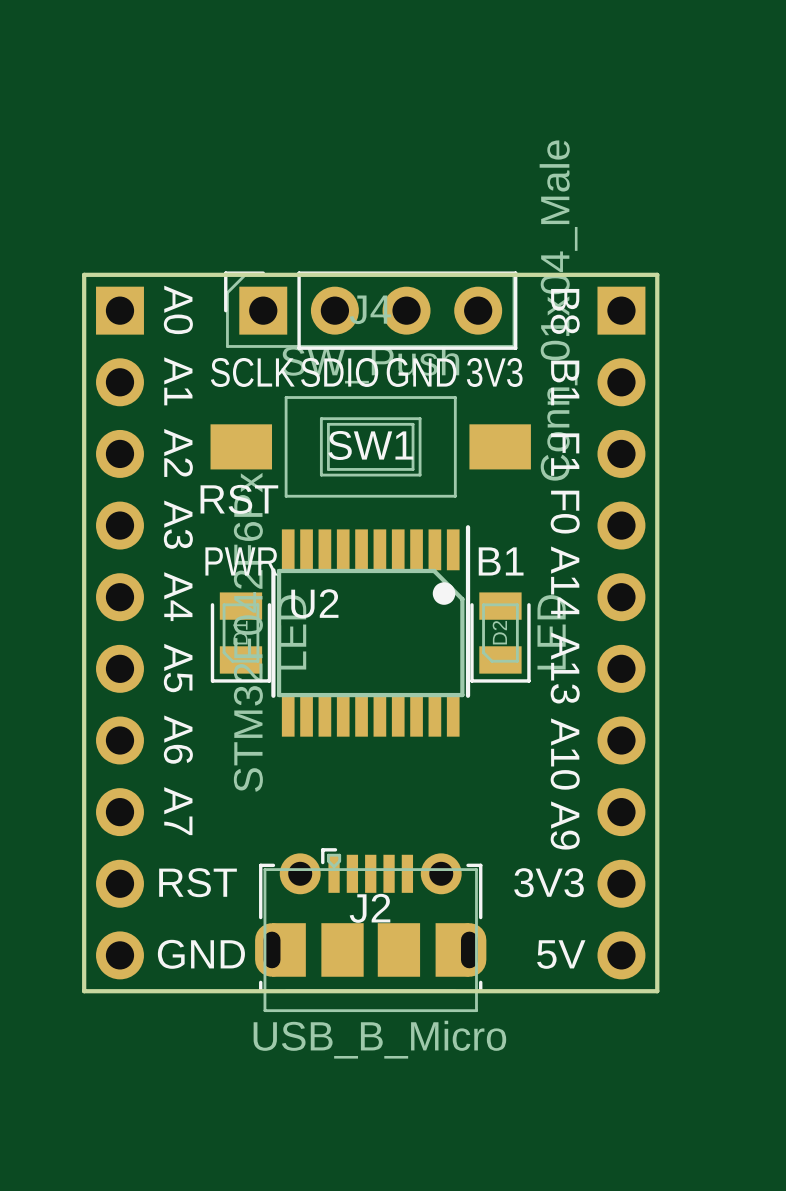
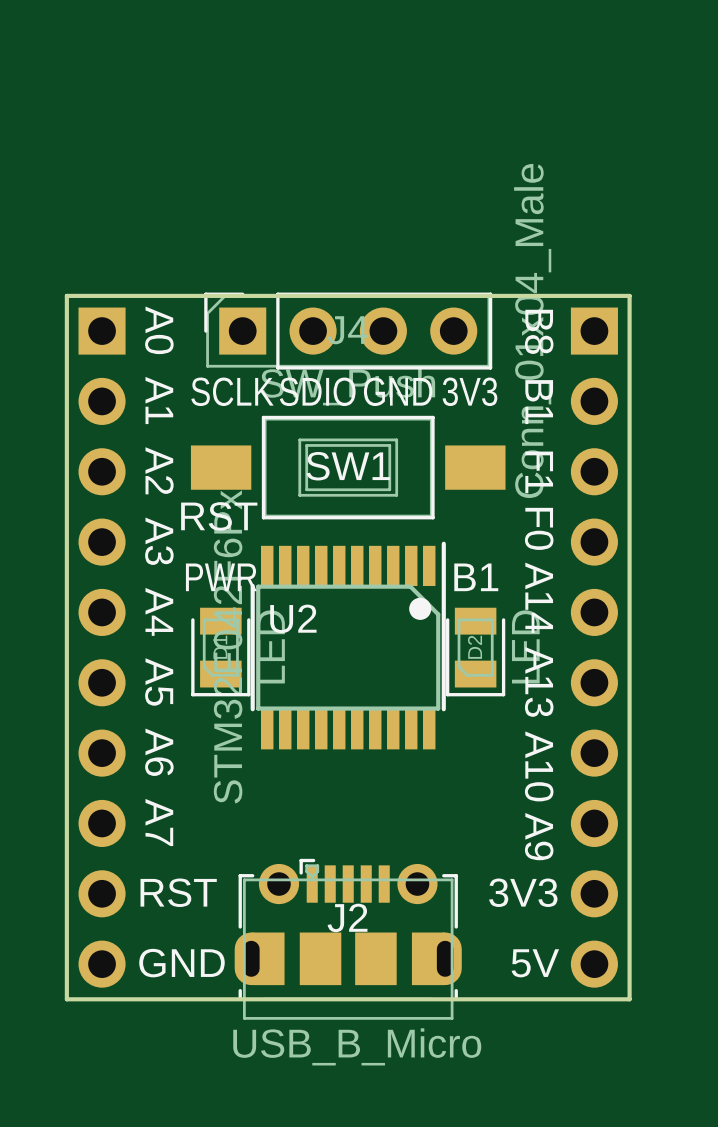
SW1 footprint: [210, 396, 531, 498] -> [190, 415, 506, 520]

